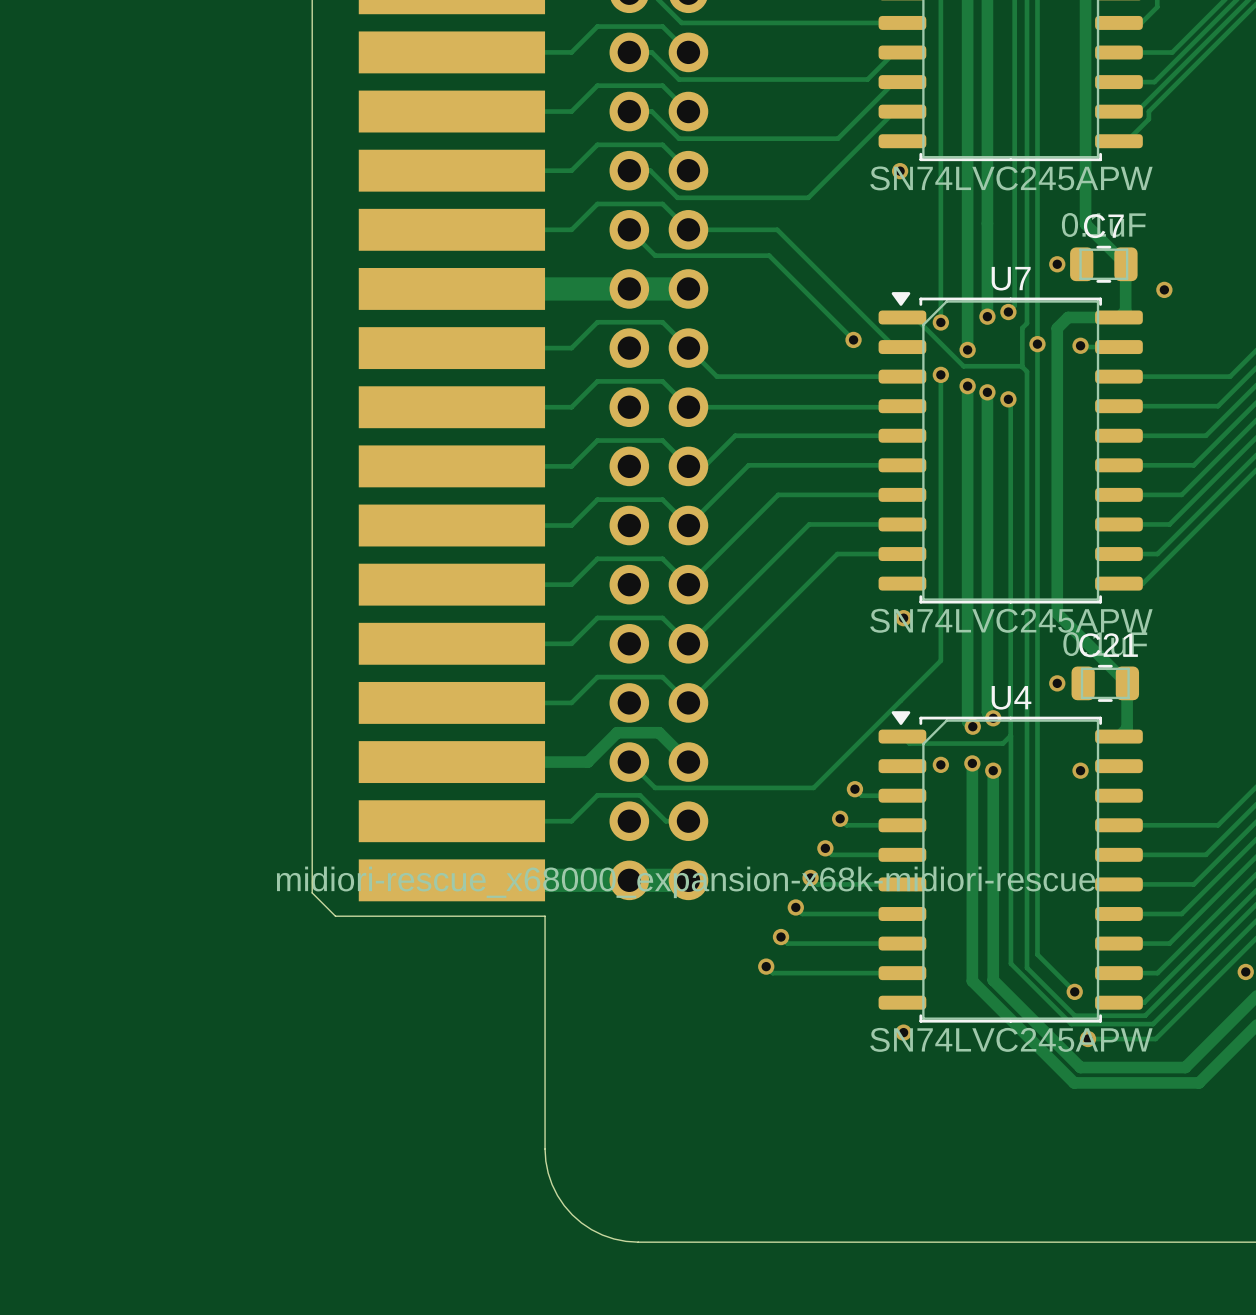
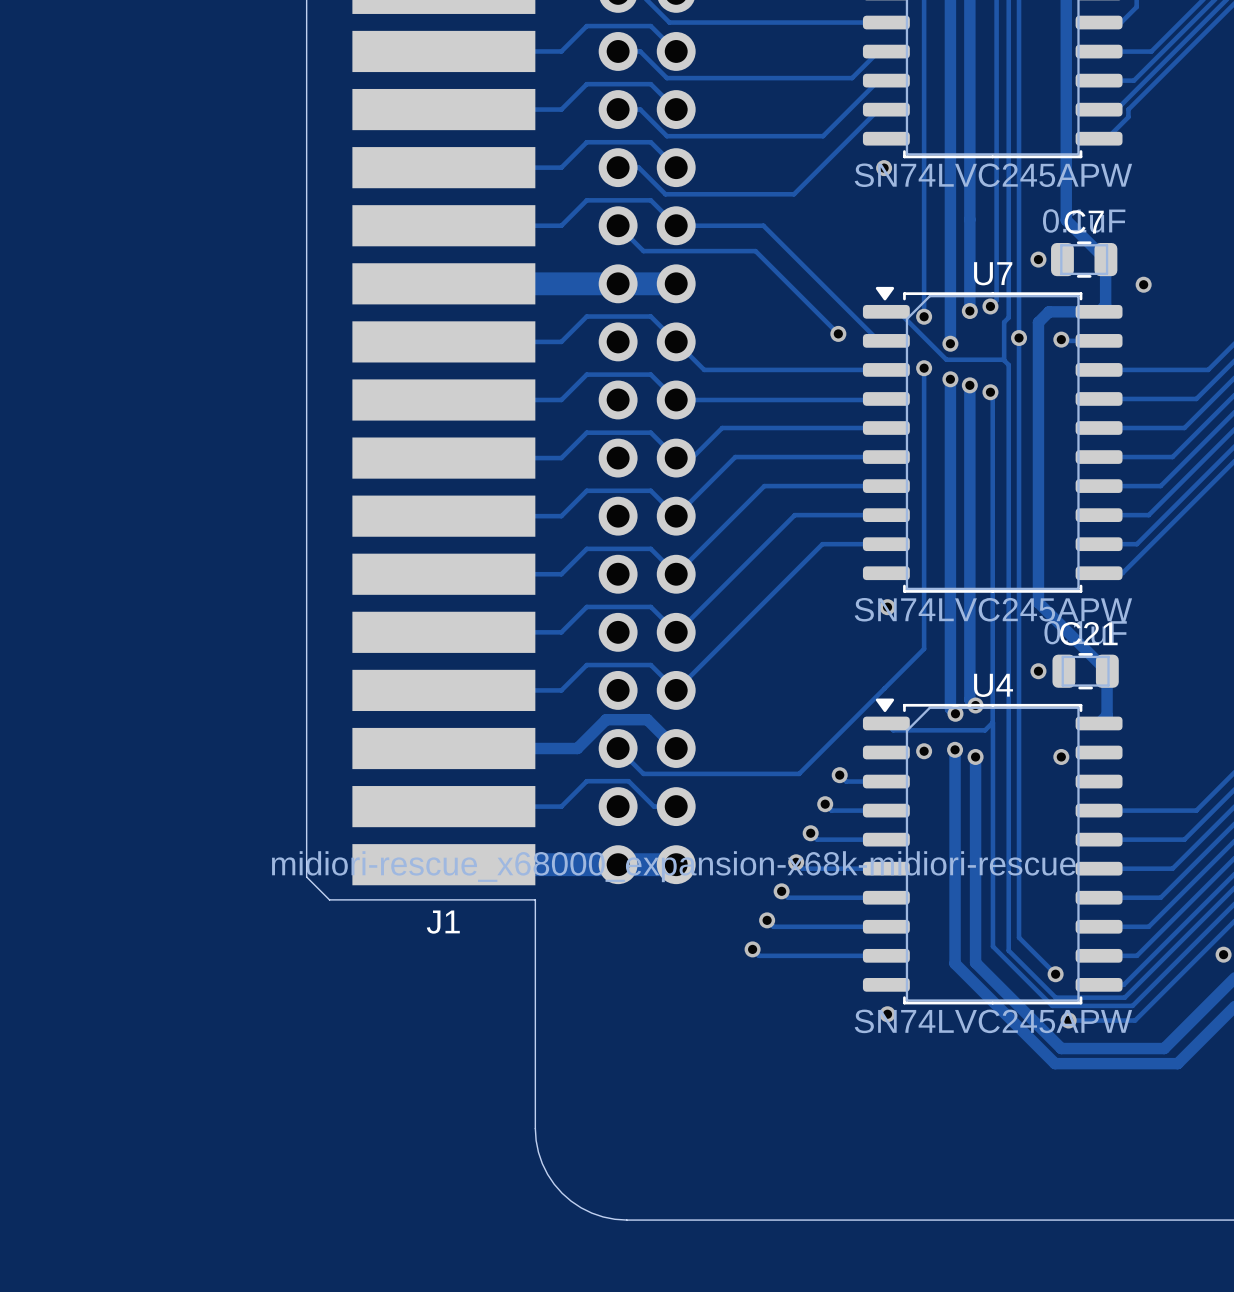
J1 name: none -> J1 (443, 922)

